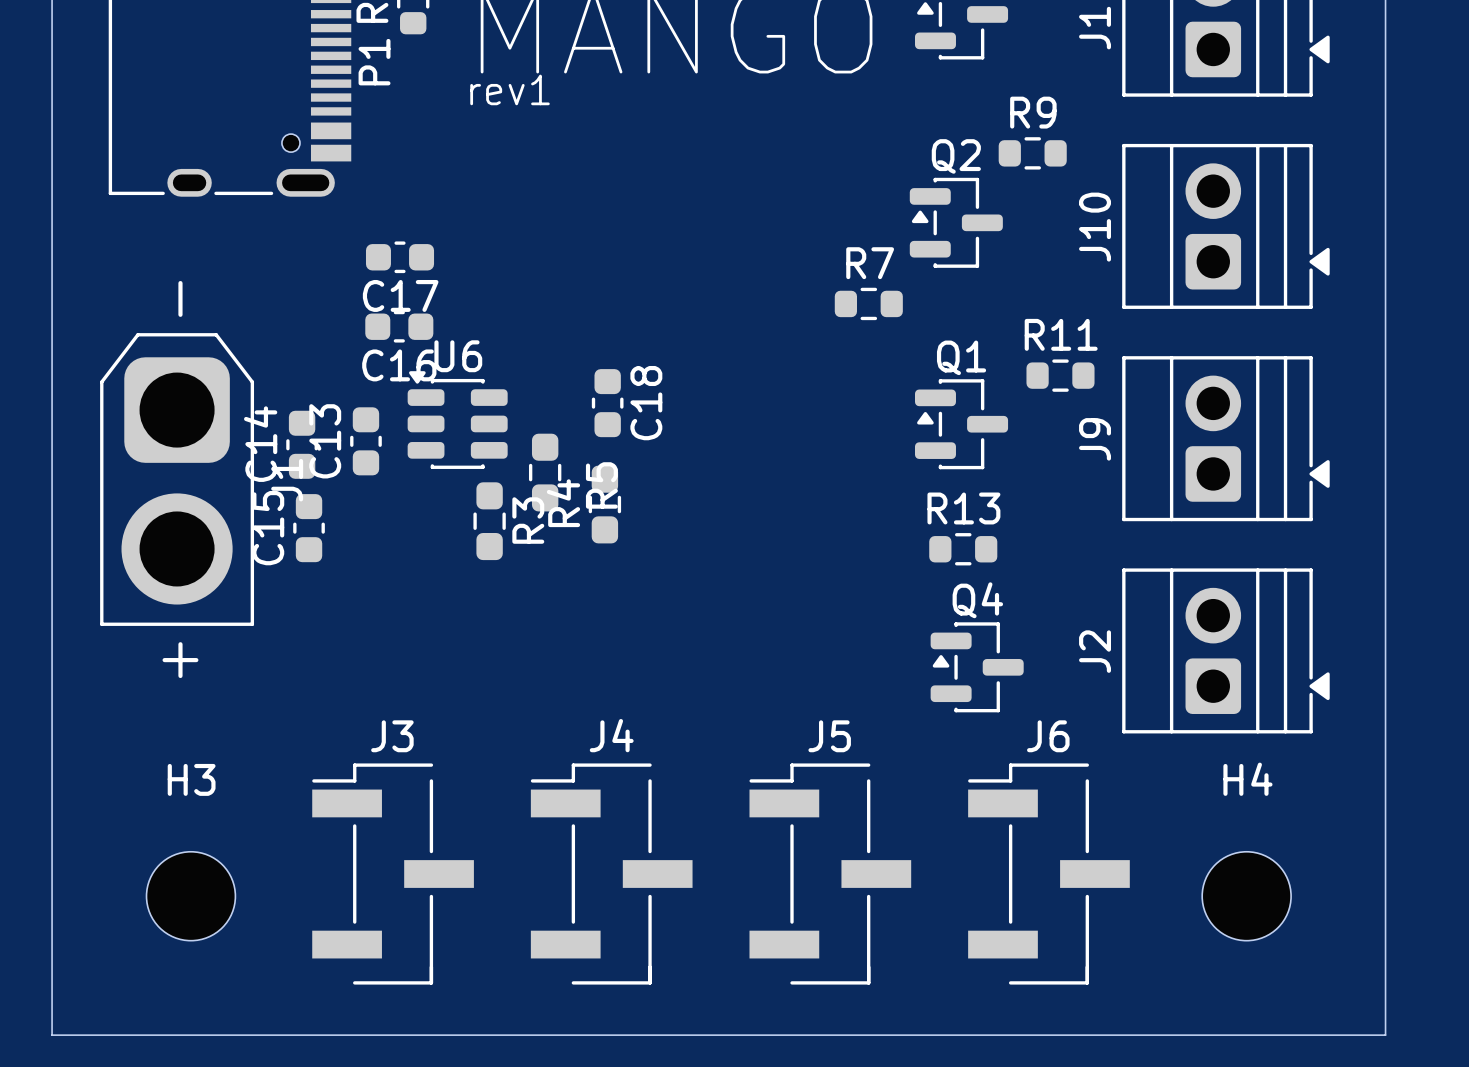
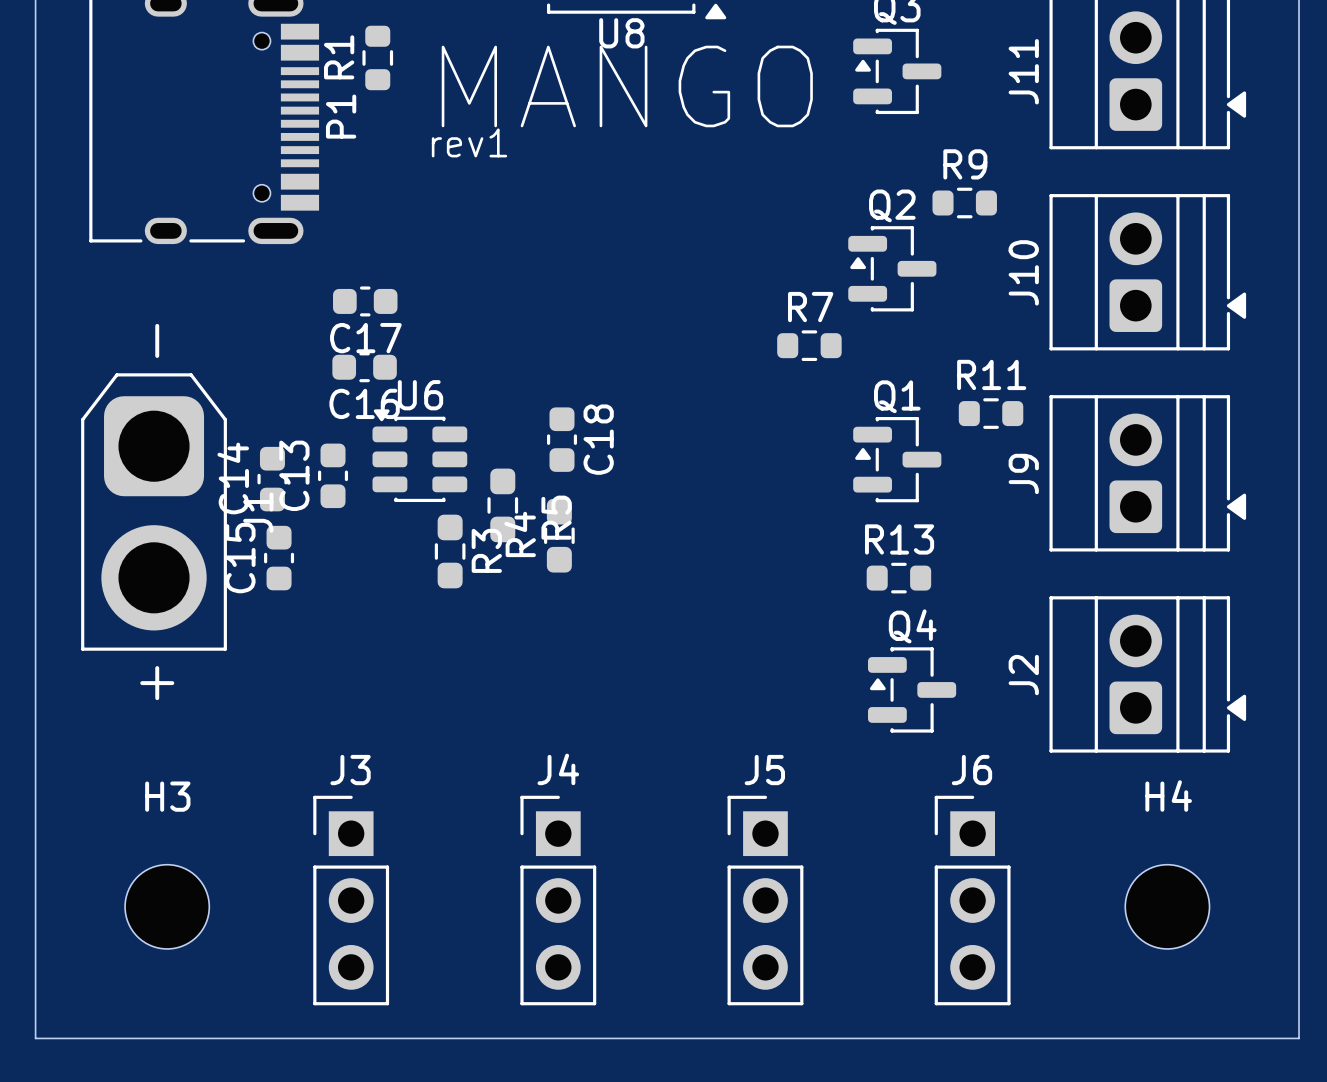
J3 footprint: [312, 763, 474, 985] -> [313, 795, 390, 1006]
J4 footprint: [530, 763, 693, 985] -> [520, 795, 597, 1006]
J5 footprint: [749, 763, 912, 985] -> [727, 795, 804, 1006]
J6 footprint: [968, 763, 1130, 985] -> [934, 795, 1011, 1006]

